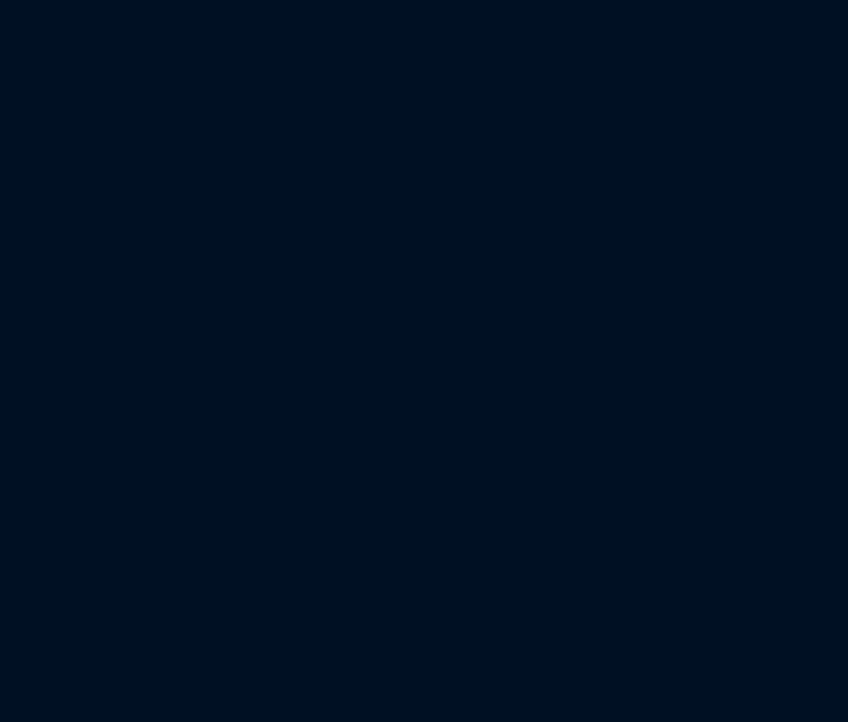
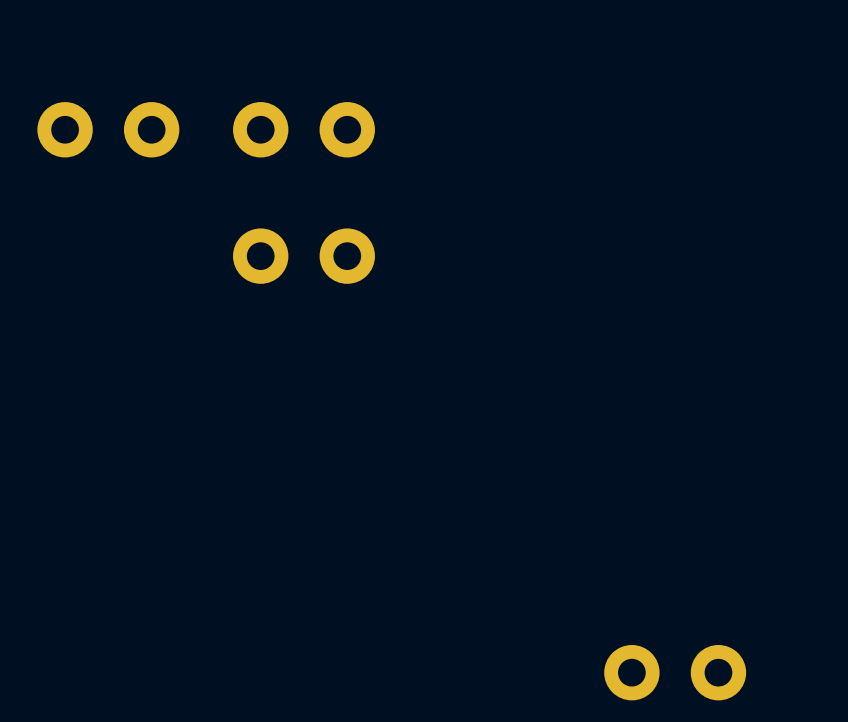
part: none -> (108, 129)
part: none -> (303, 129)
part: none -> (303, 256)
part: none -> (675, 672)

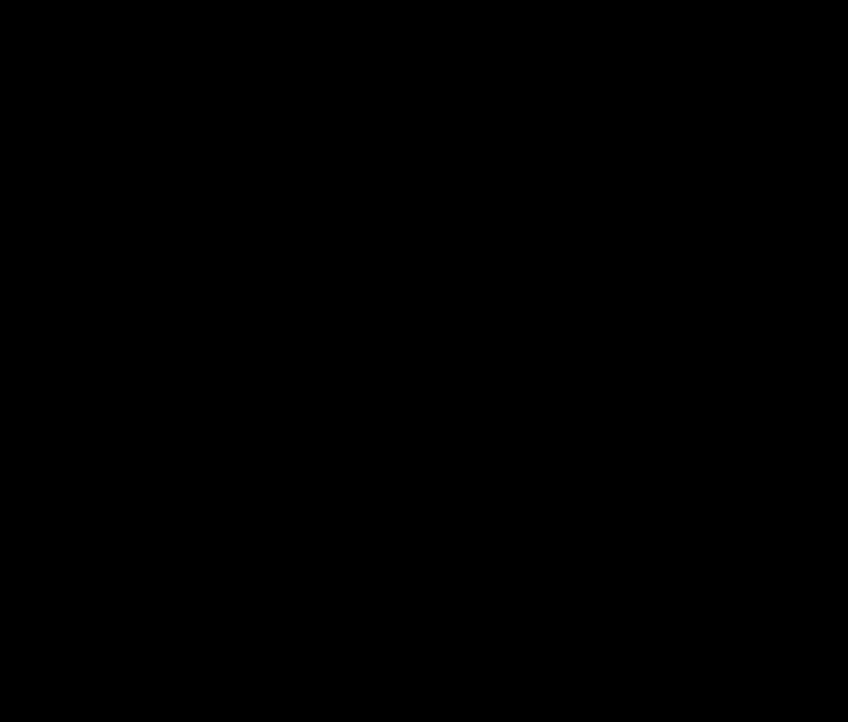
part: (108, 129) -> none
part: (303, 129) -> none
part: (303, 256) -> none
part: (675, 672) -> none

